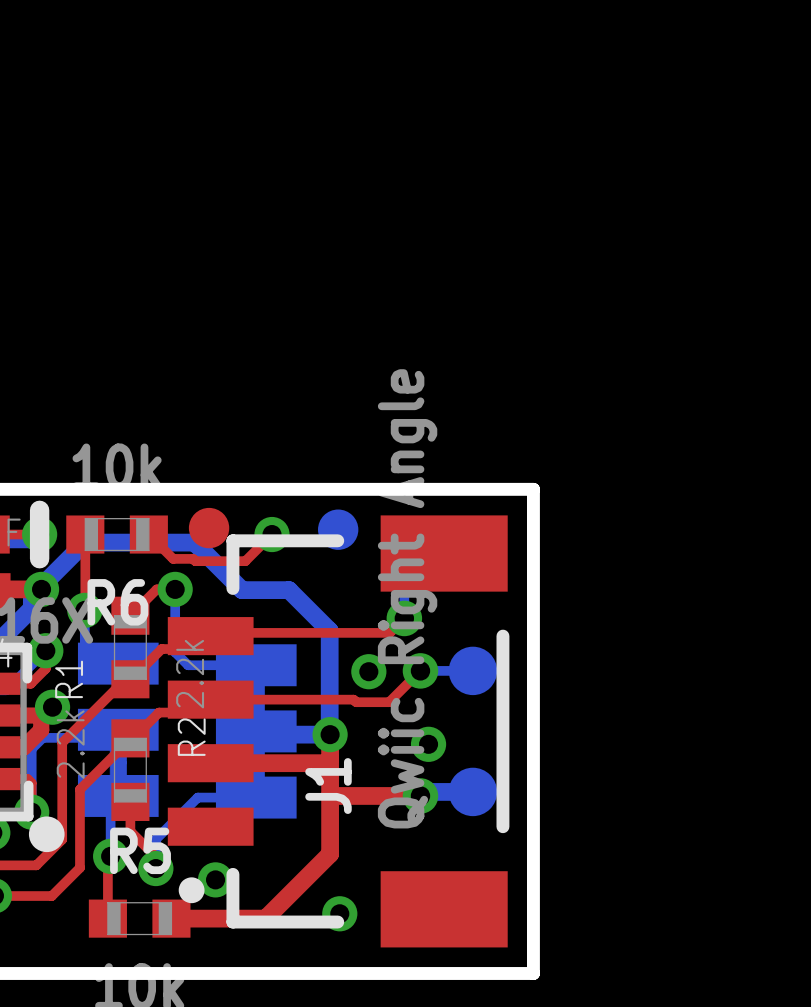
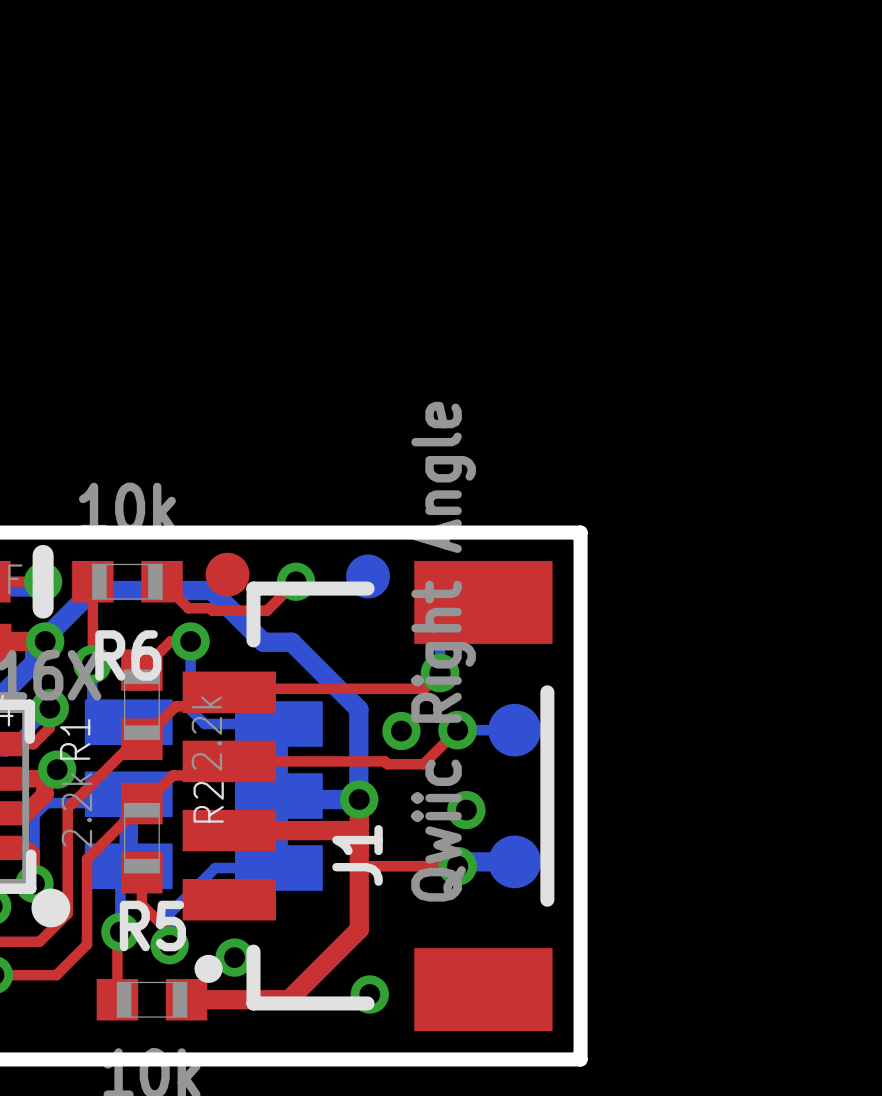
bottom track: (268, 590) (289, 590) (329, 630) (329, 651) -> (291, 642) (358, 709)
top track width: thick (330, 795) (420, 795) -> thin (359, 866) (457, 866)

